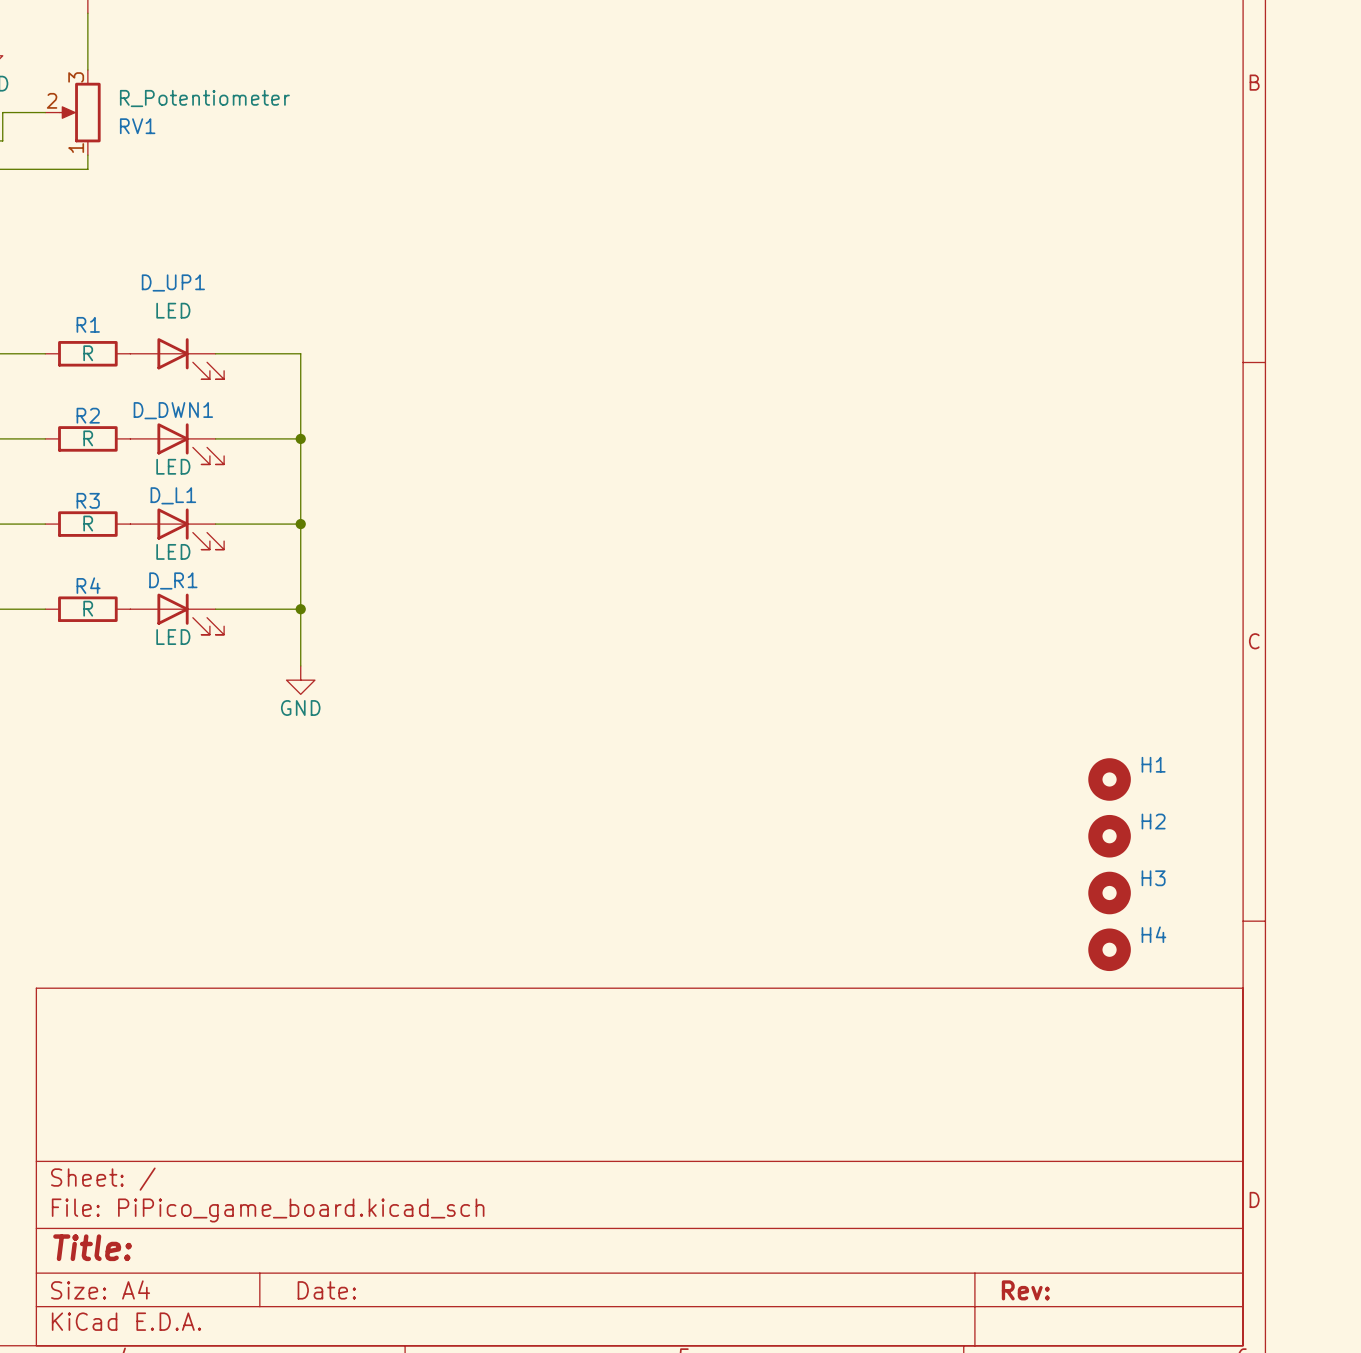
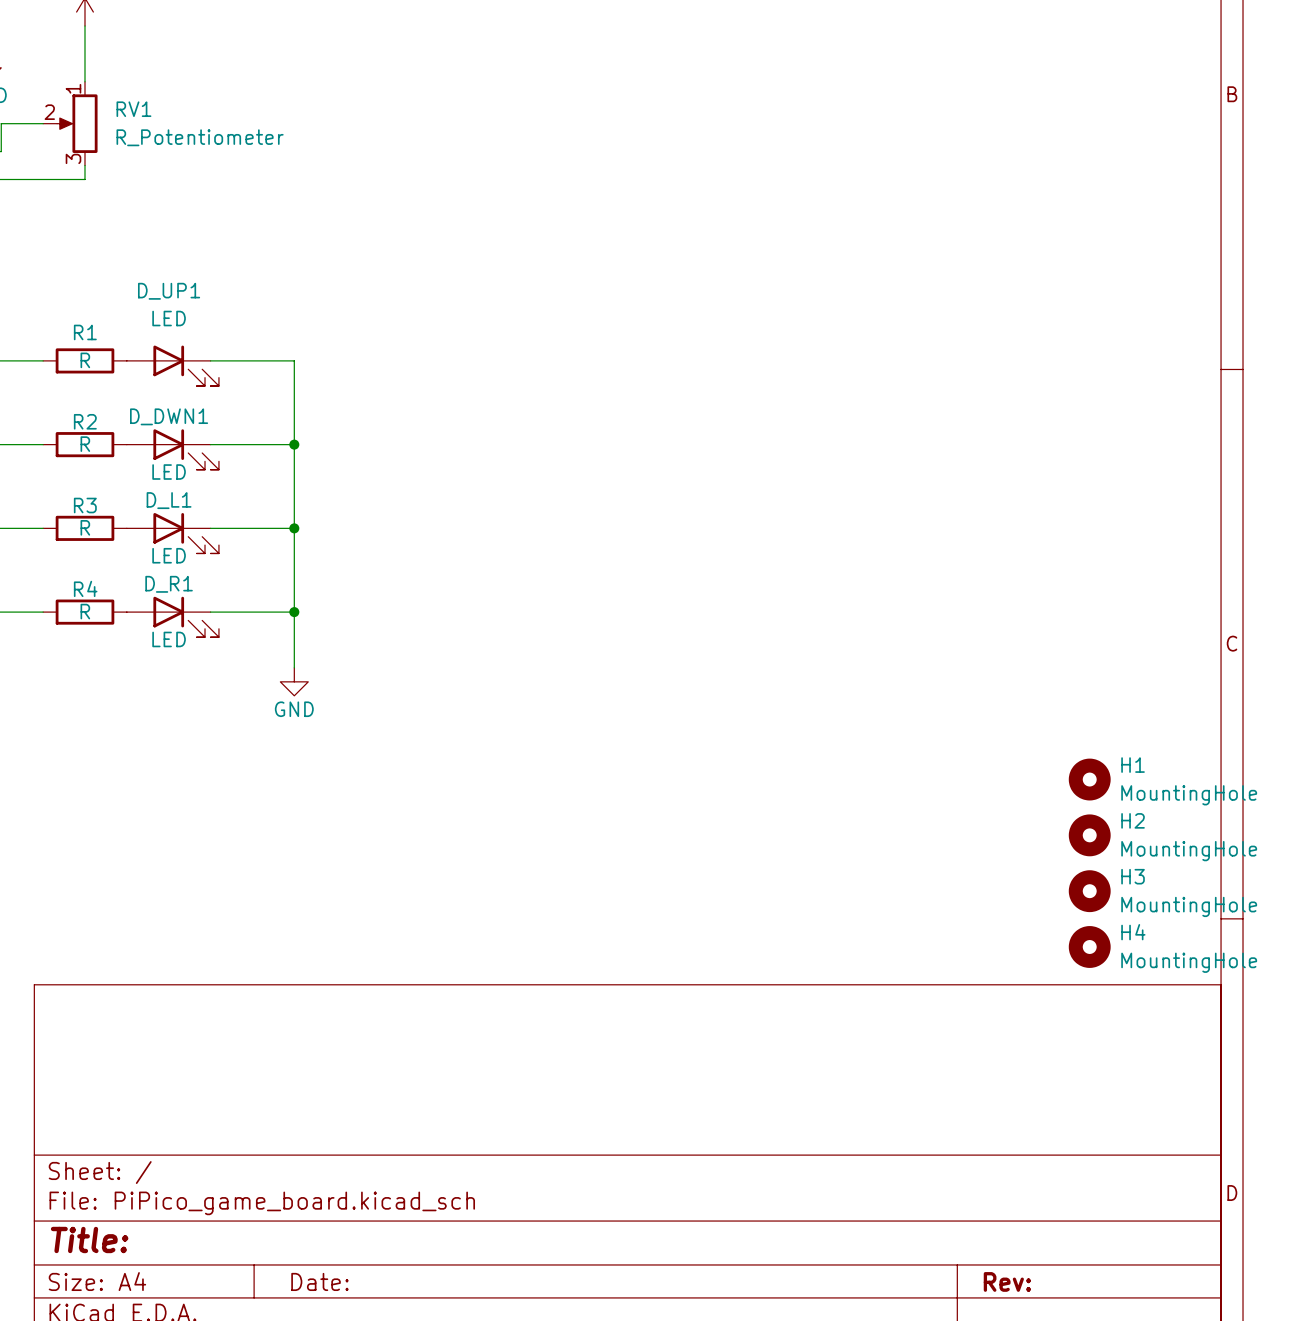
RV1 flip: as is (80, 112) -> up-down (77, 123)
H1 value: none -> MountingHole (1189, 795)
H2 value: none -> MountingHole (1189, 851)
H3 value: none -> MountingHole (1189, 906)
H4 value: none -> MountingHole (1189, 962)

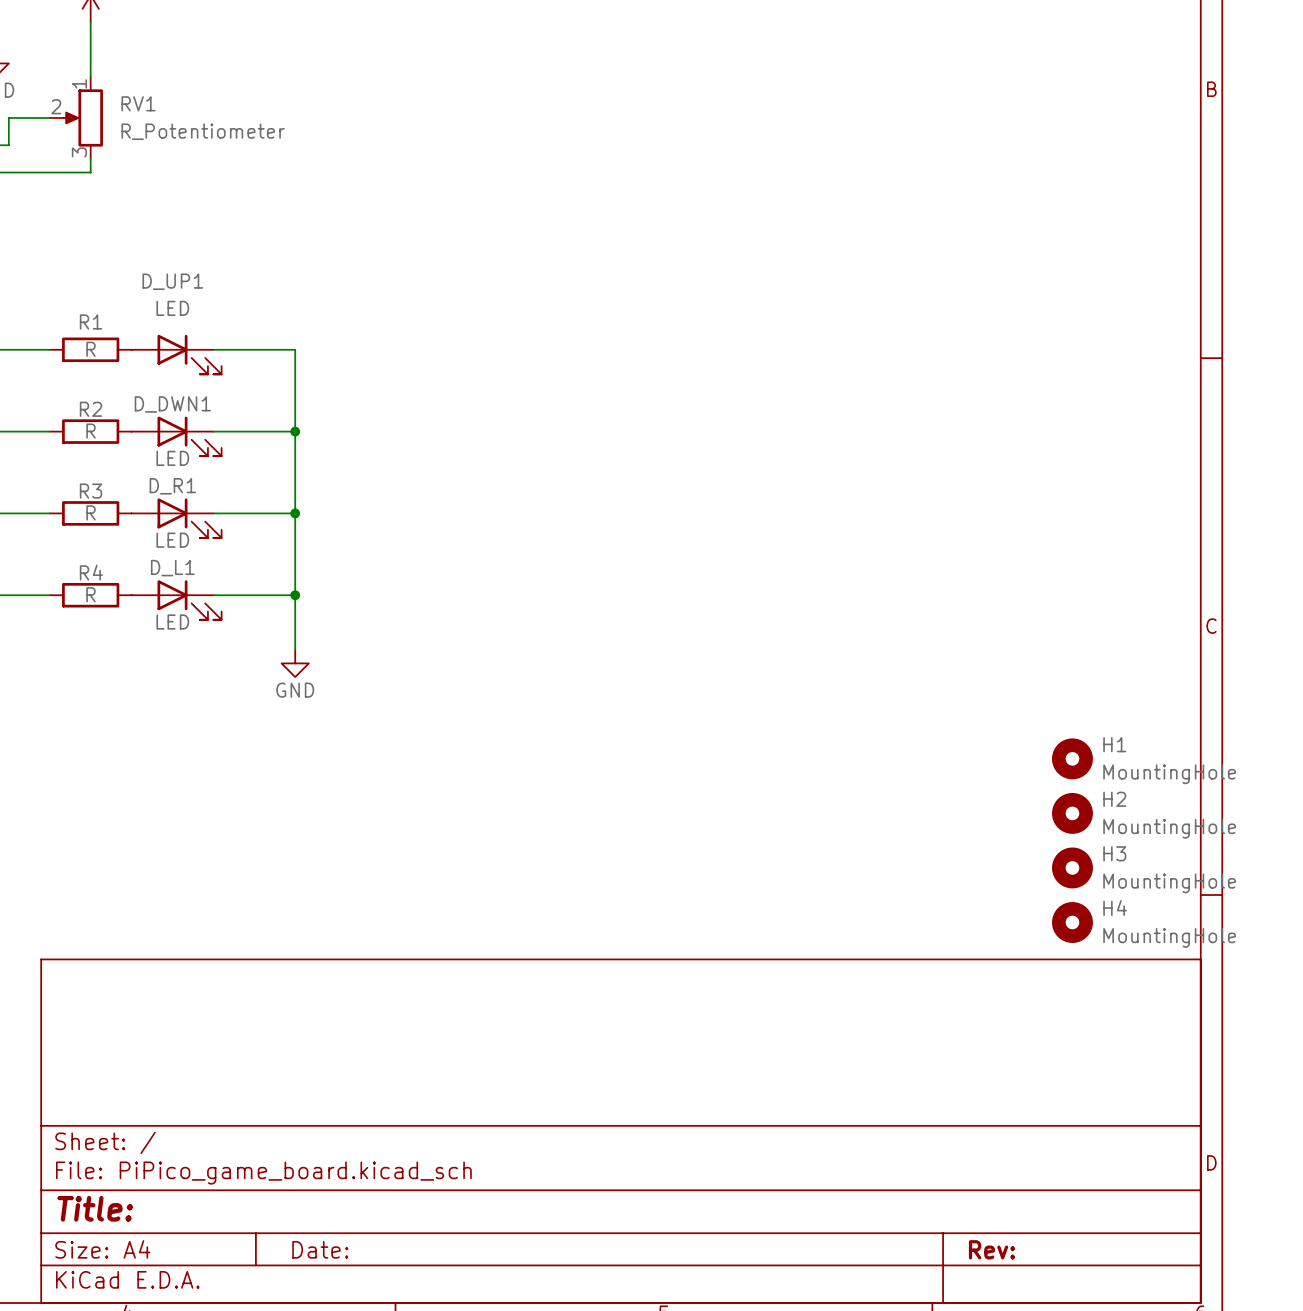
D_L1 name: D_L1 (169, 500) -> D_R1 (172, 486)
D_R1 name: D_R1 (169, 584) -> D_L1 (172, 568)

